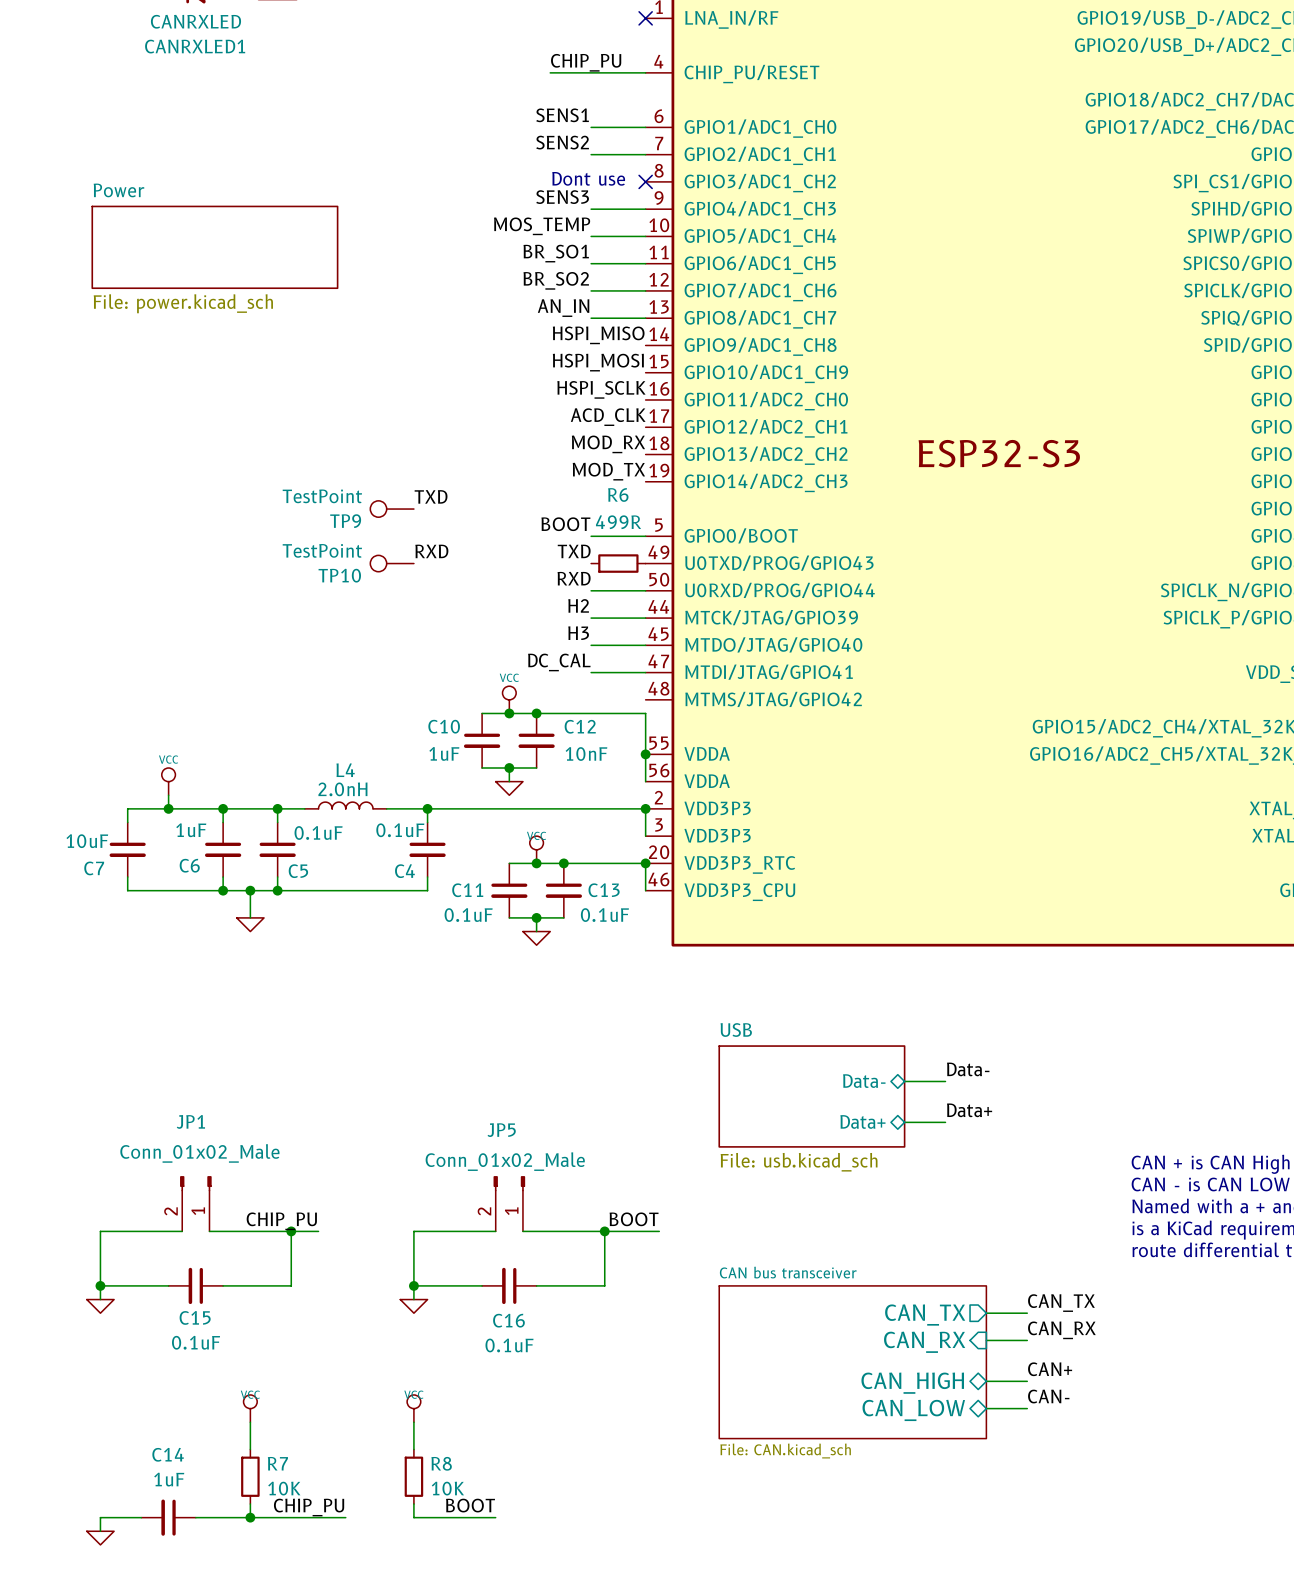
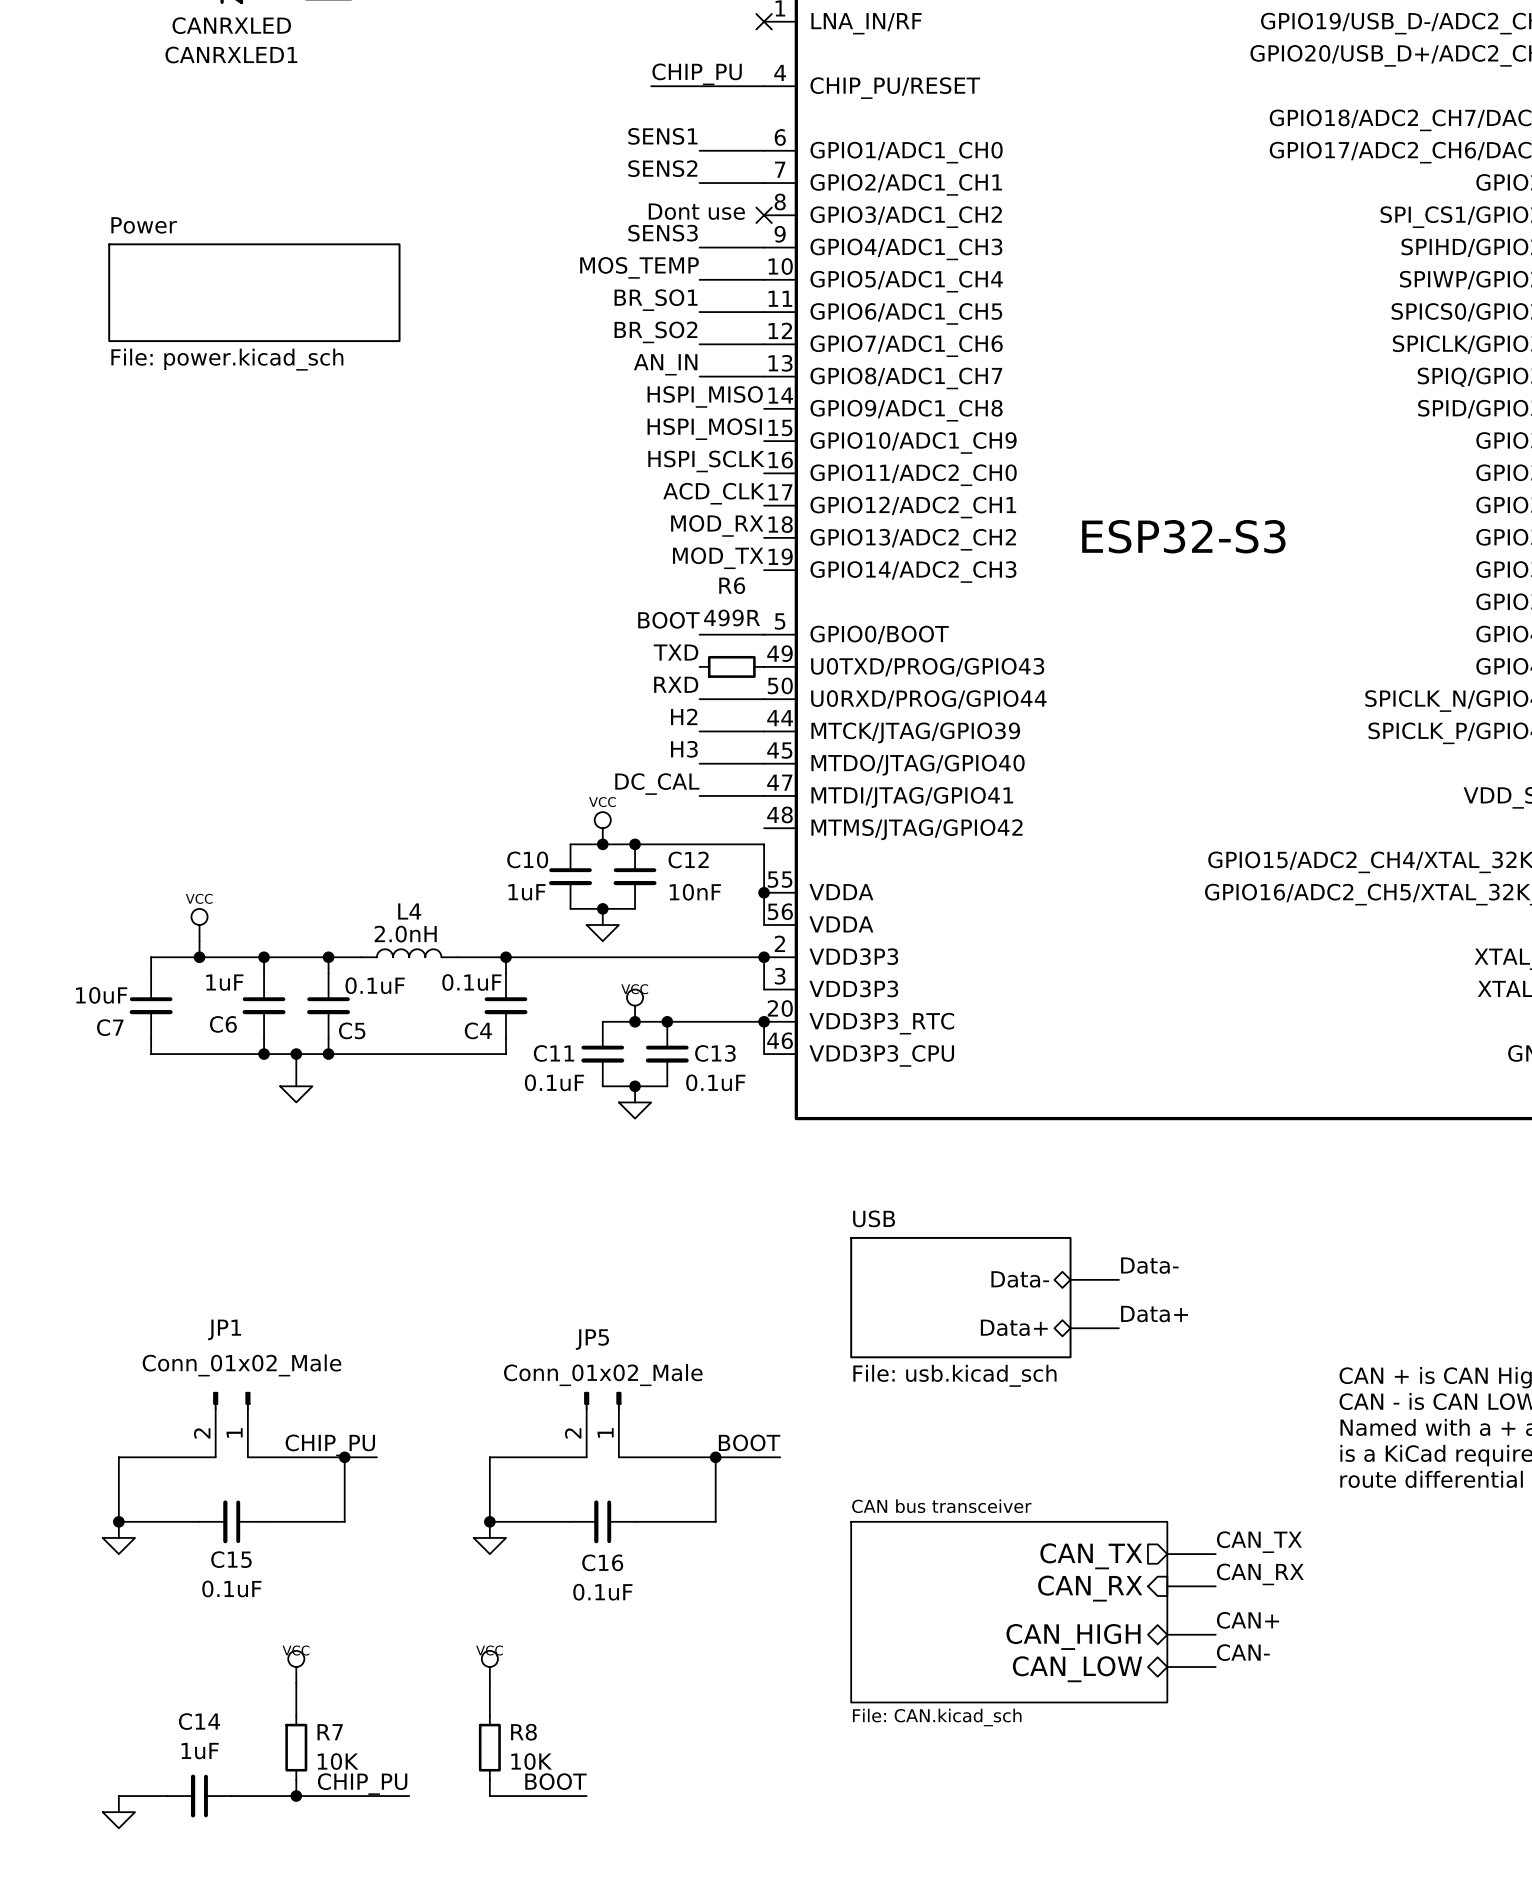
label: TXD (431, 496) -> none
TP9: TestPoint (392, 509) -> none
label: RXD (431, 551) -> none
TP10: TestPoint (392, 563) -> none

